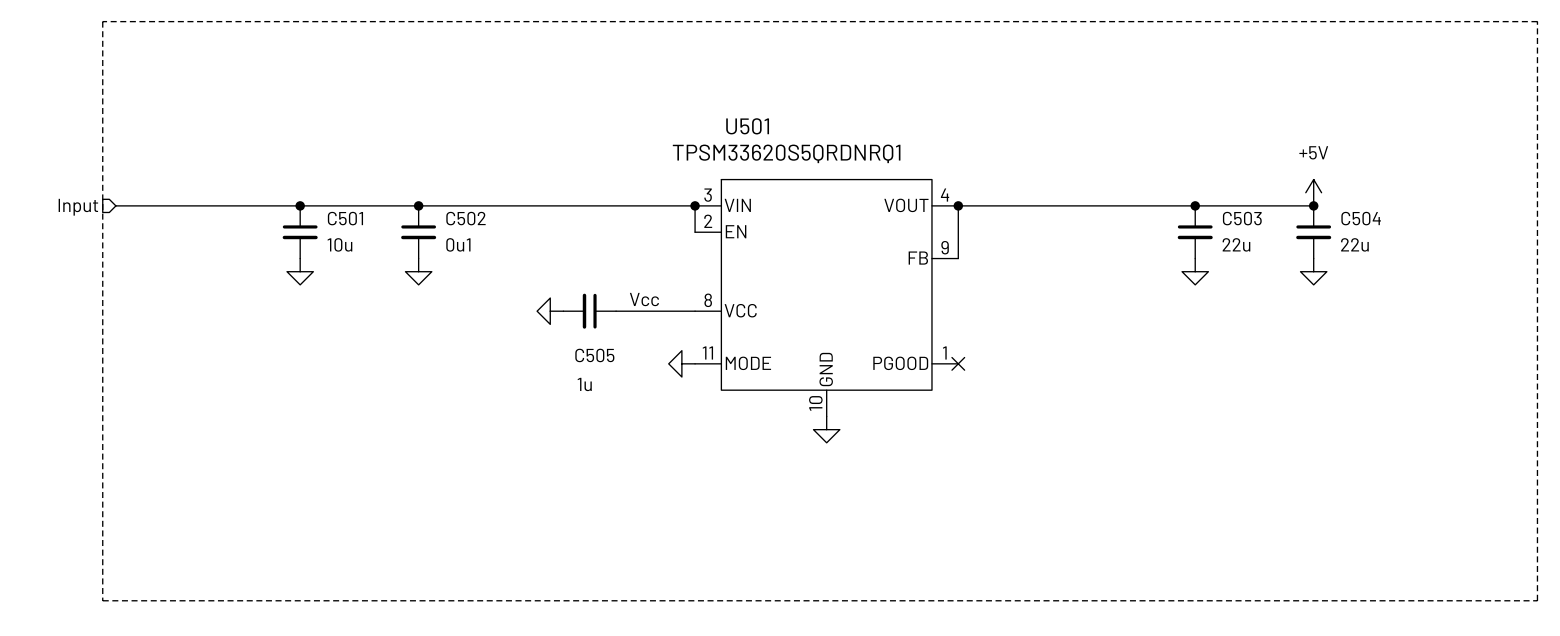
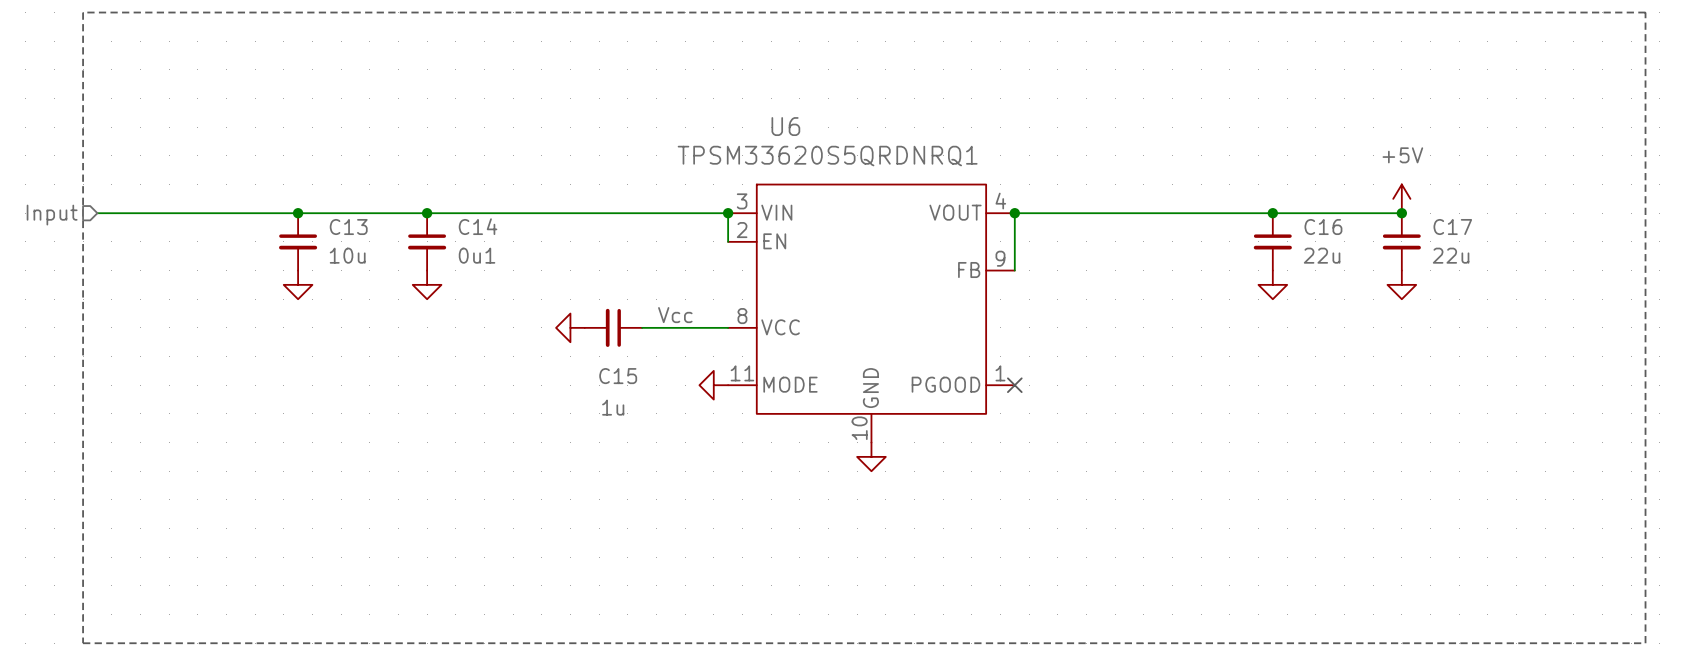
U501 name: U501 (747, 126) -> U6 (785, 126)
C501 name: C501 (345, 218) -> C13 (348, 227)
C502 name: C502 (465, 218) -> C14 (478, 226)
C503 name: C503 (1242, 218) -> C16 (1323, 227)
C504 name: C504 (1361, 218) -> C17 (1452, 227)
C505 name: C505 (594, 355) -> C15 (618, 376)

